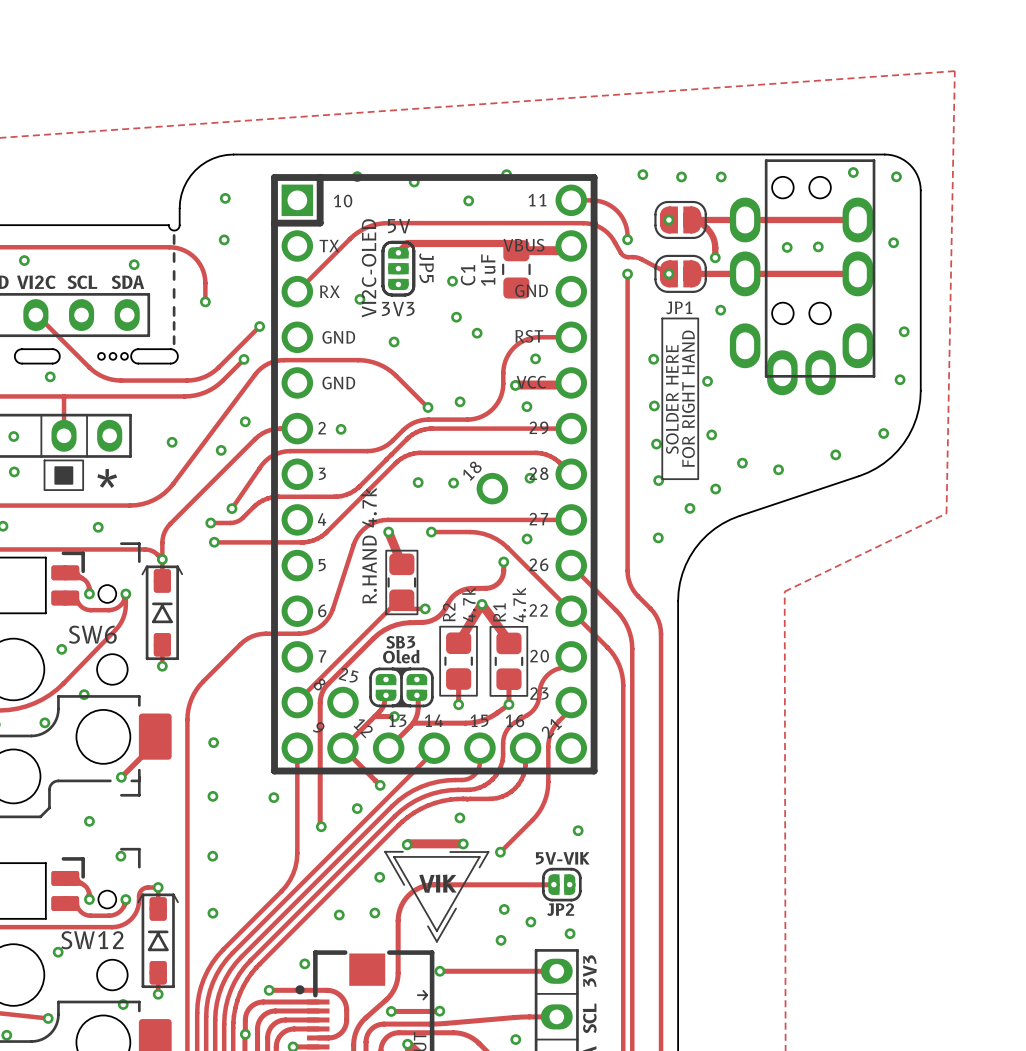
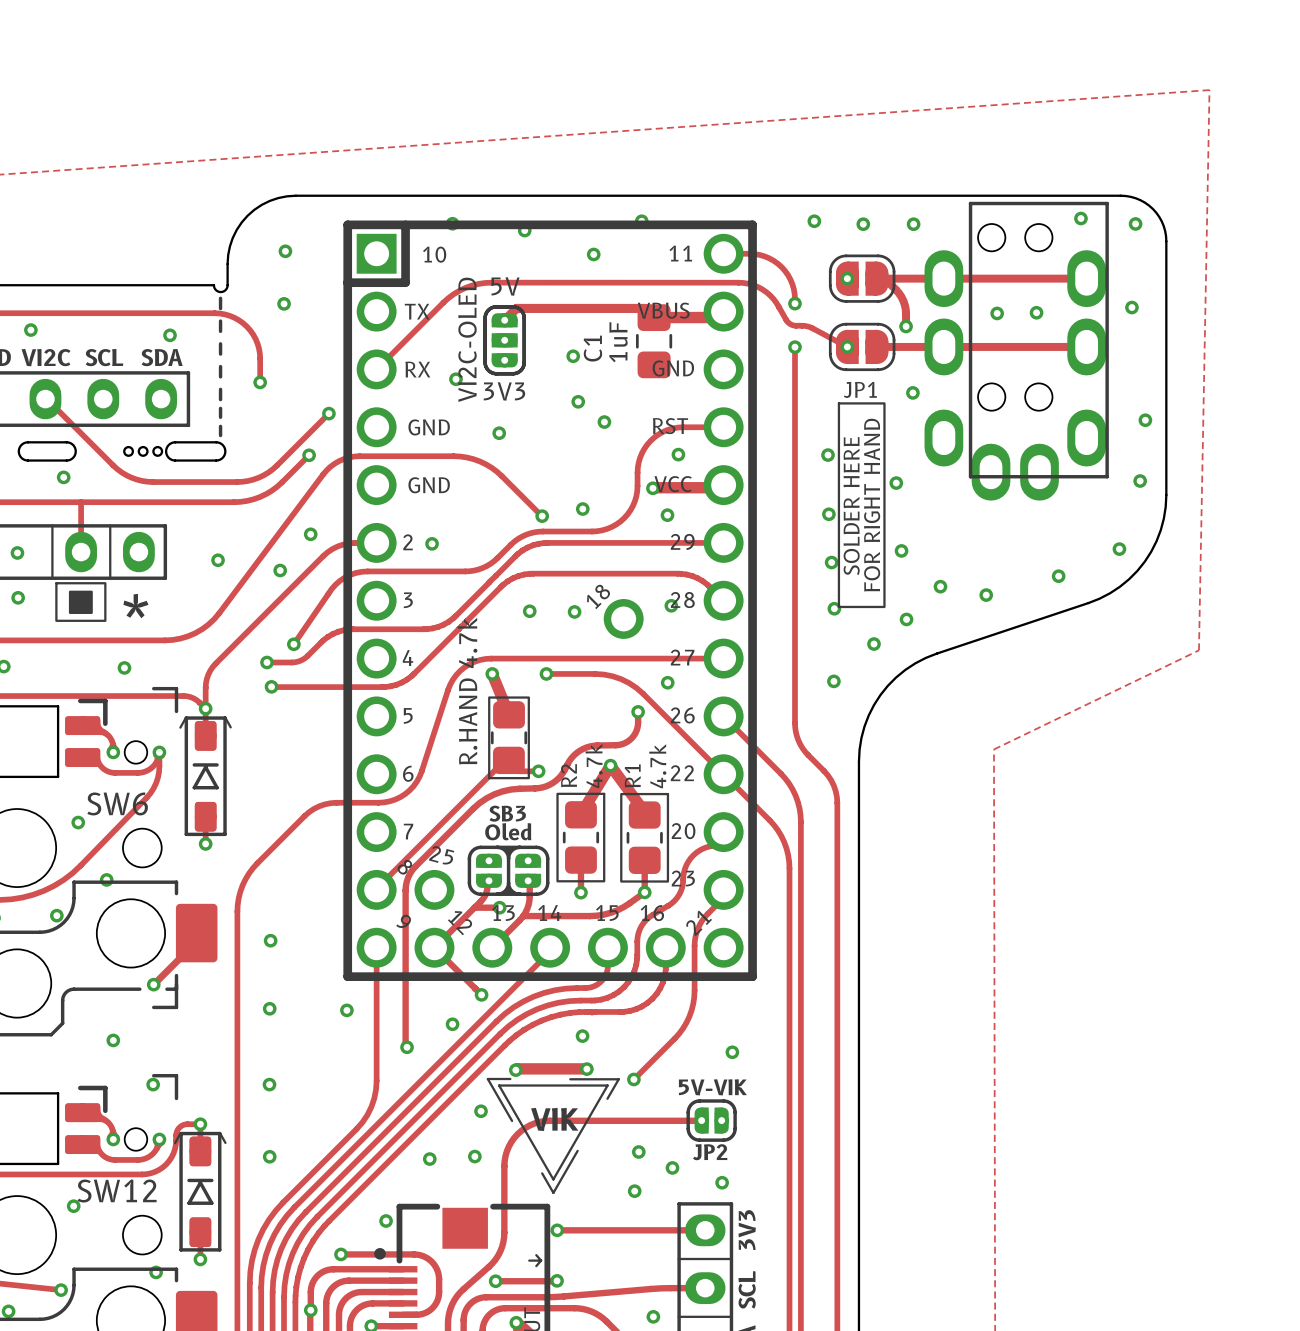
part text: JP5 (426, 268) -> none

